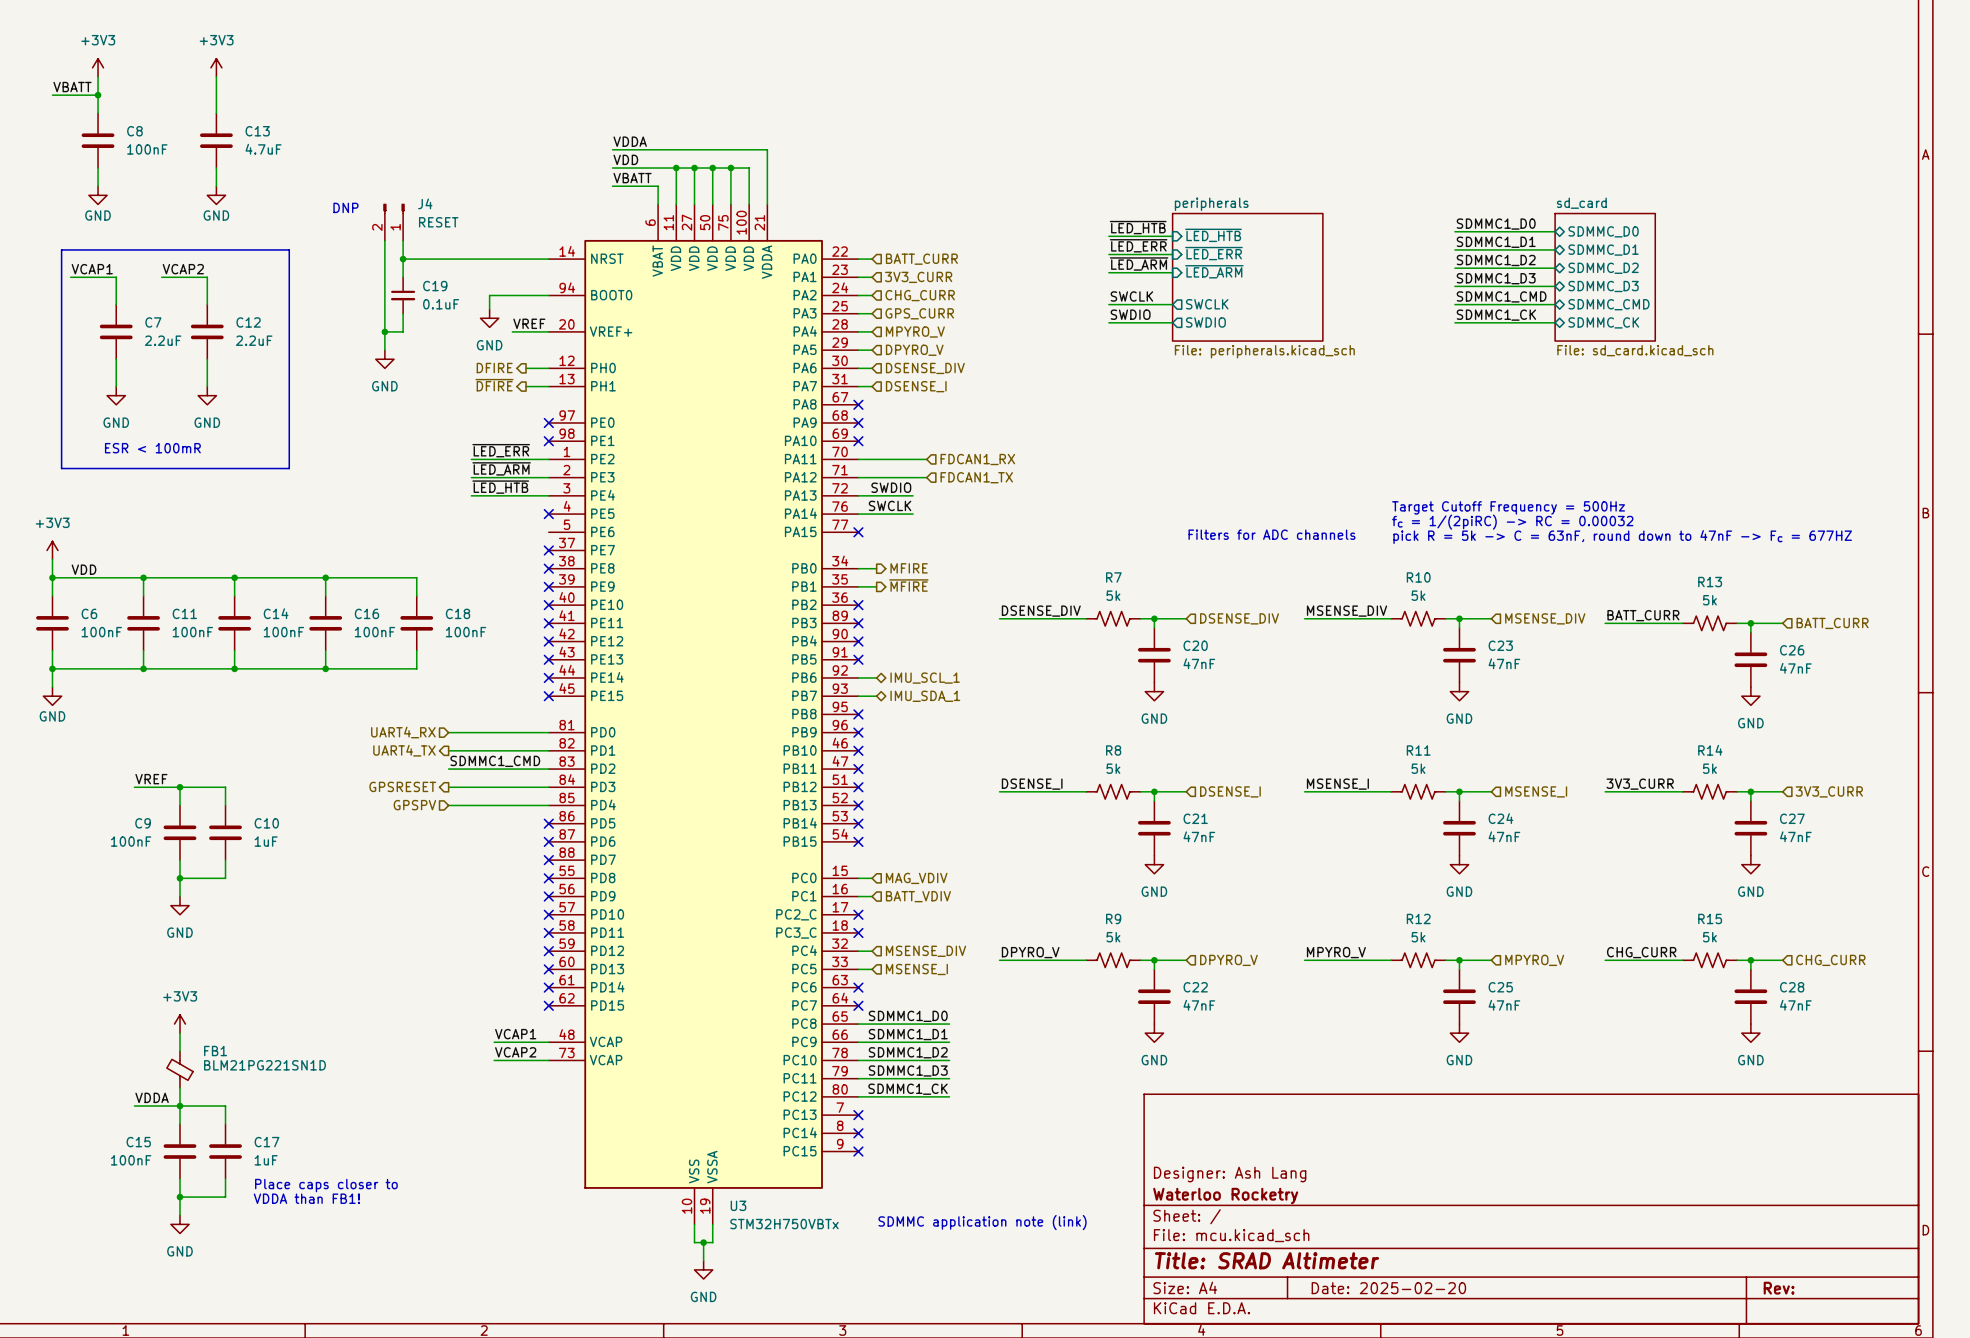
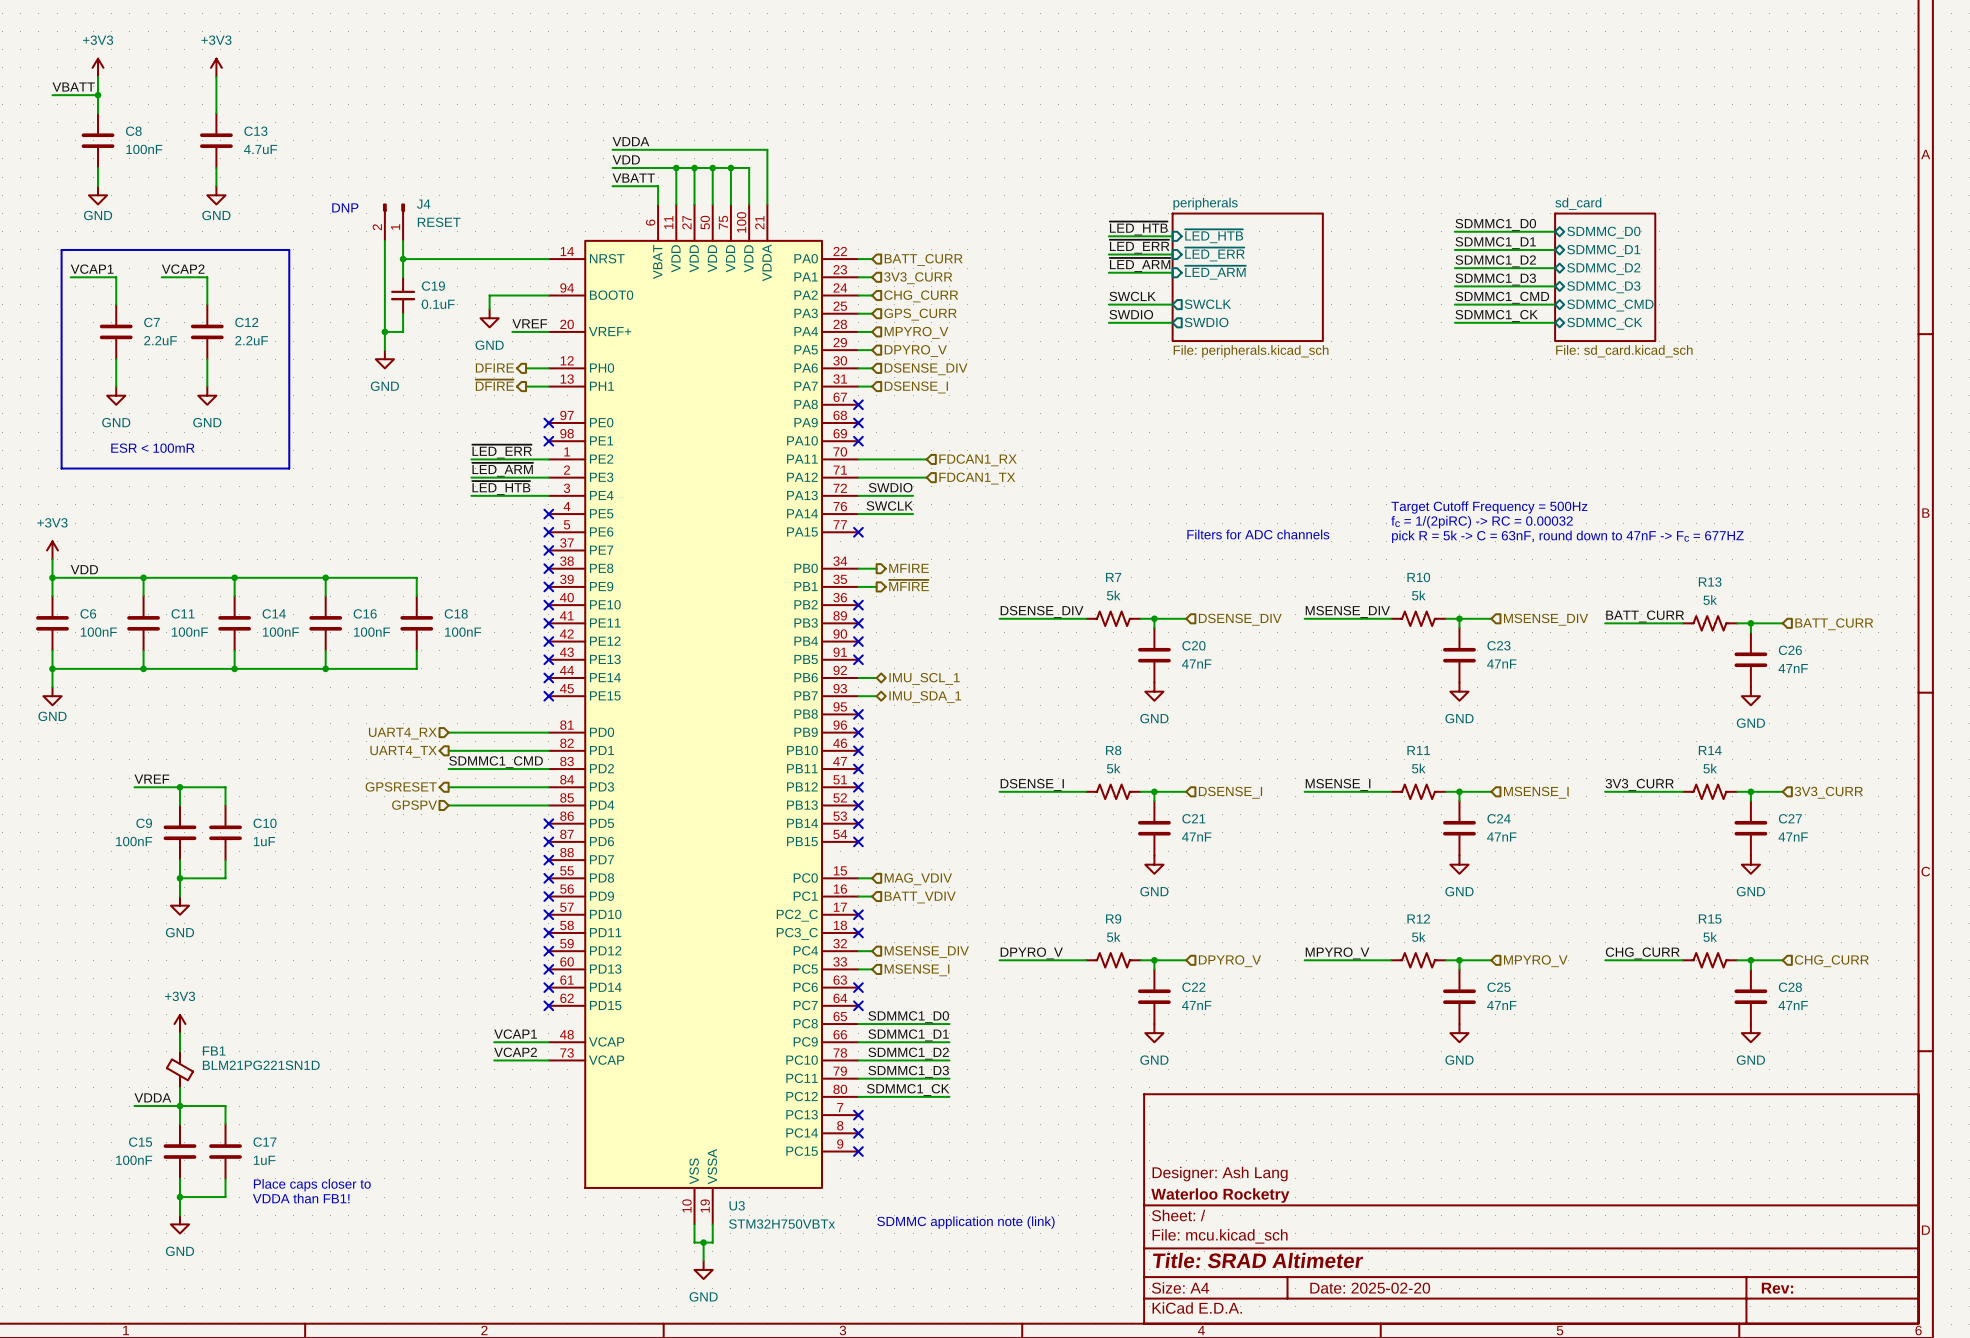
no-connect mark: none -> (548, 532)

